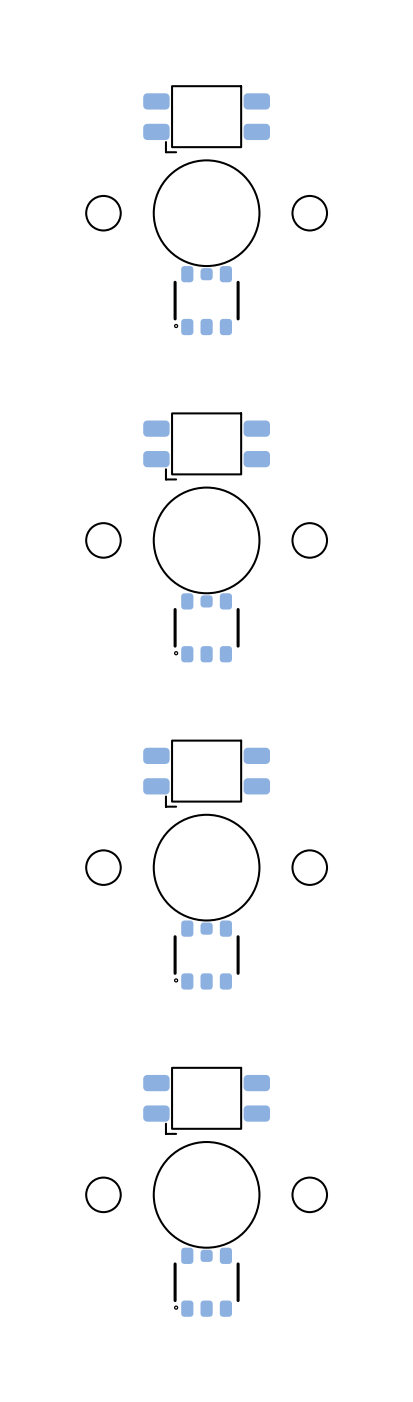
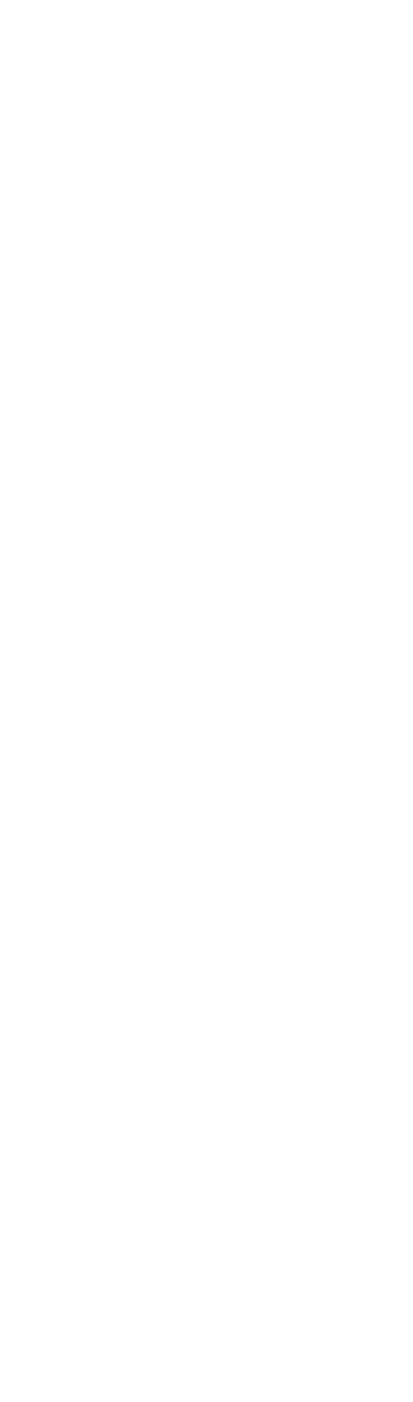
part: (206, 210) -> none
part: (206, 537) -> none
part: (206, 864) -> none
part: (206, 1191) -> none

